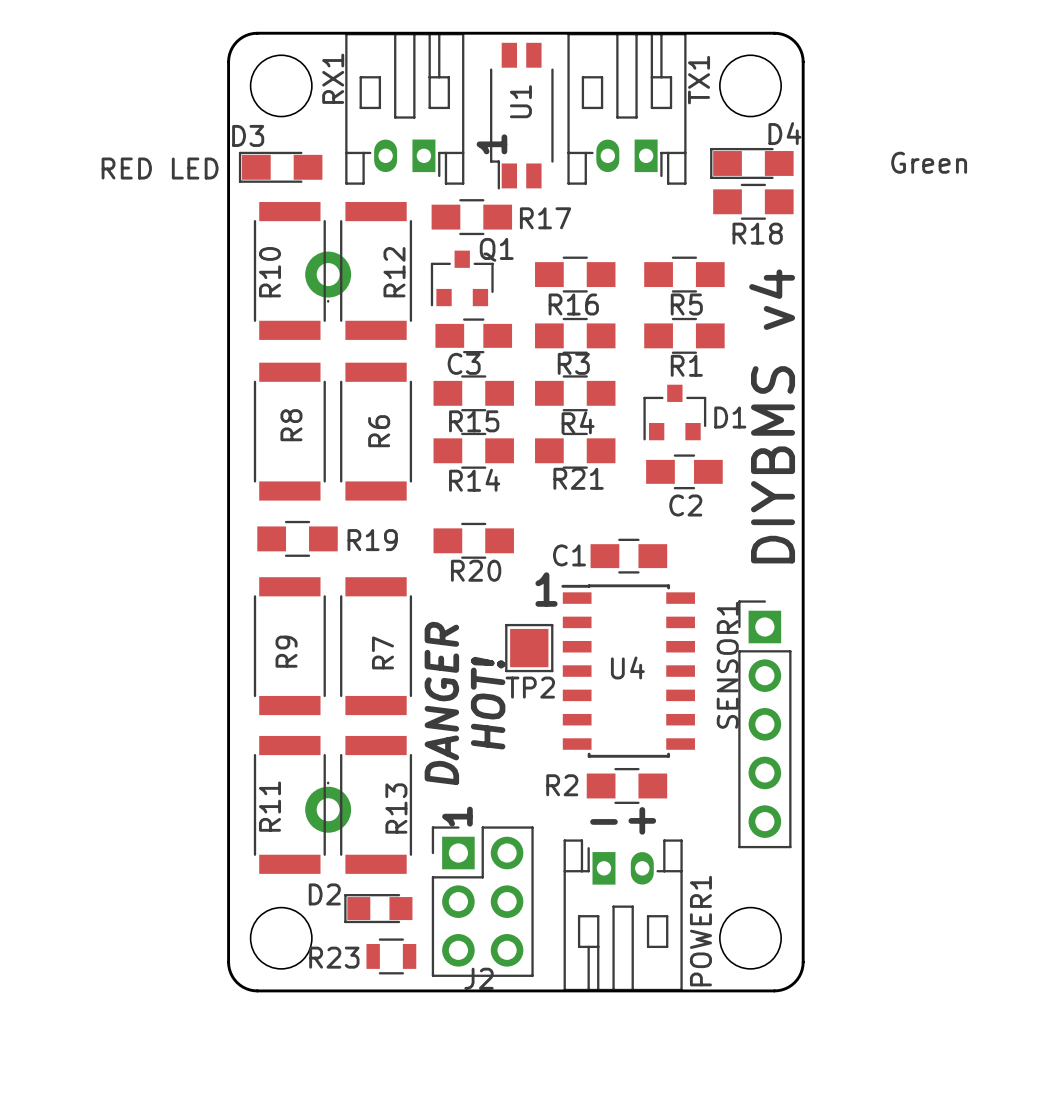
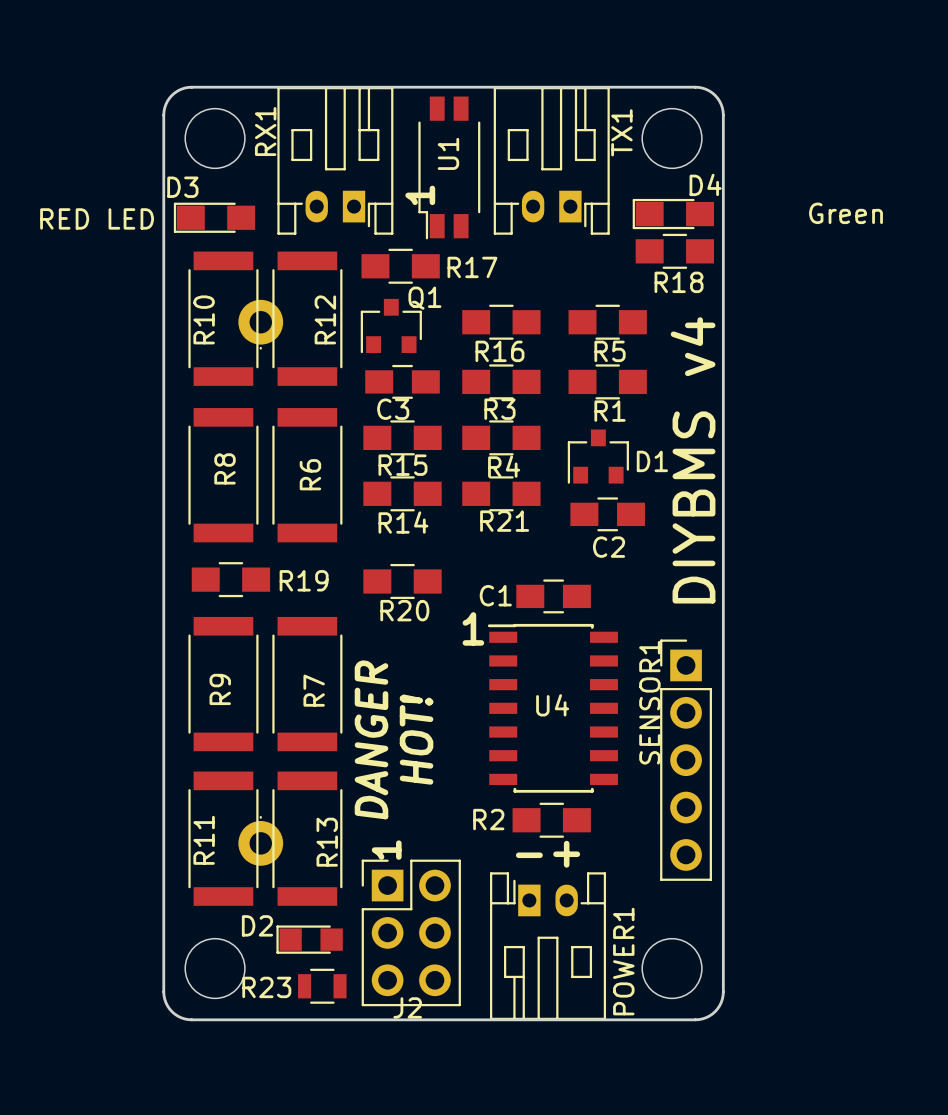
TP2: (529, 648) -> none

